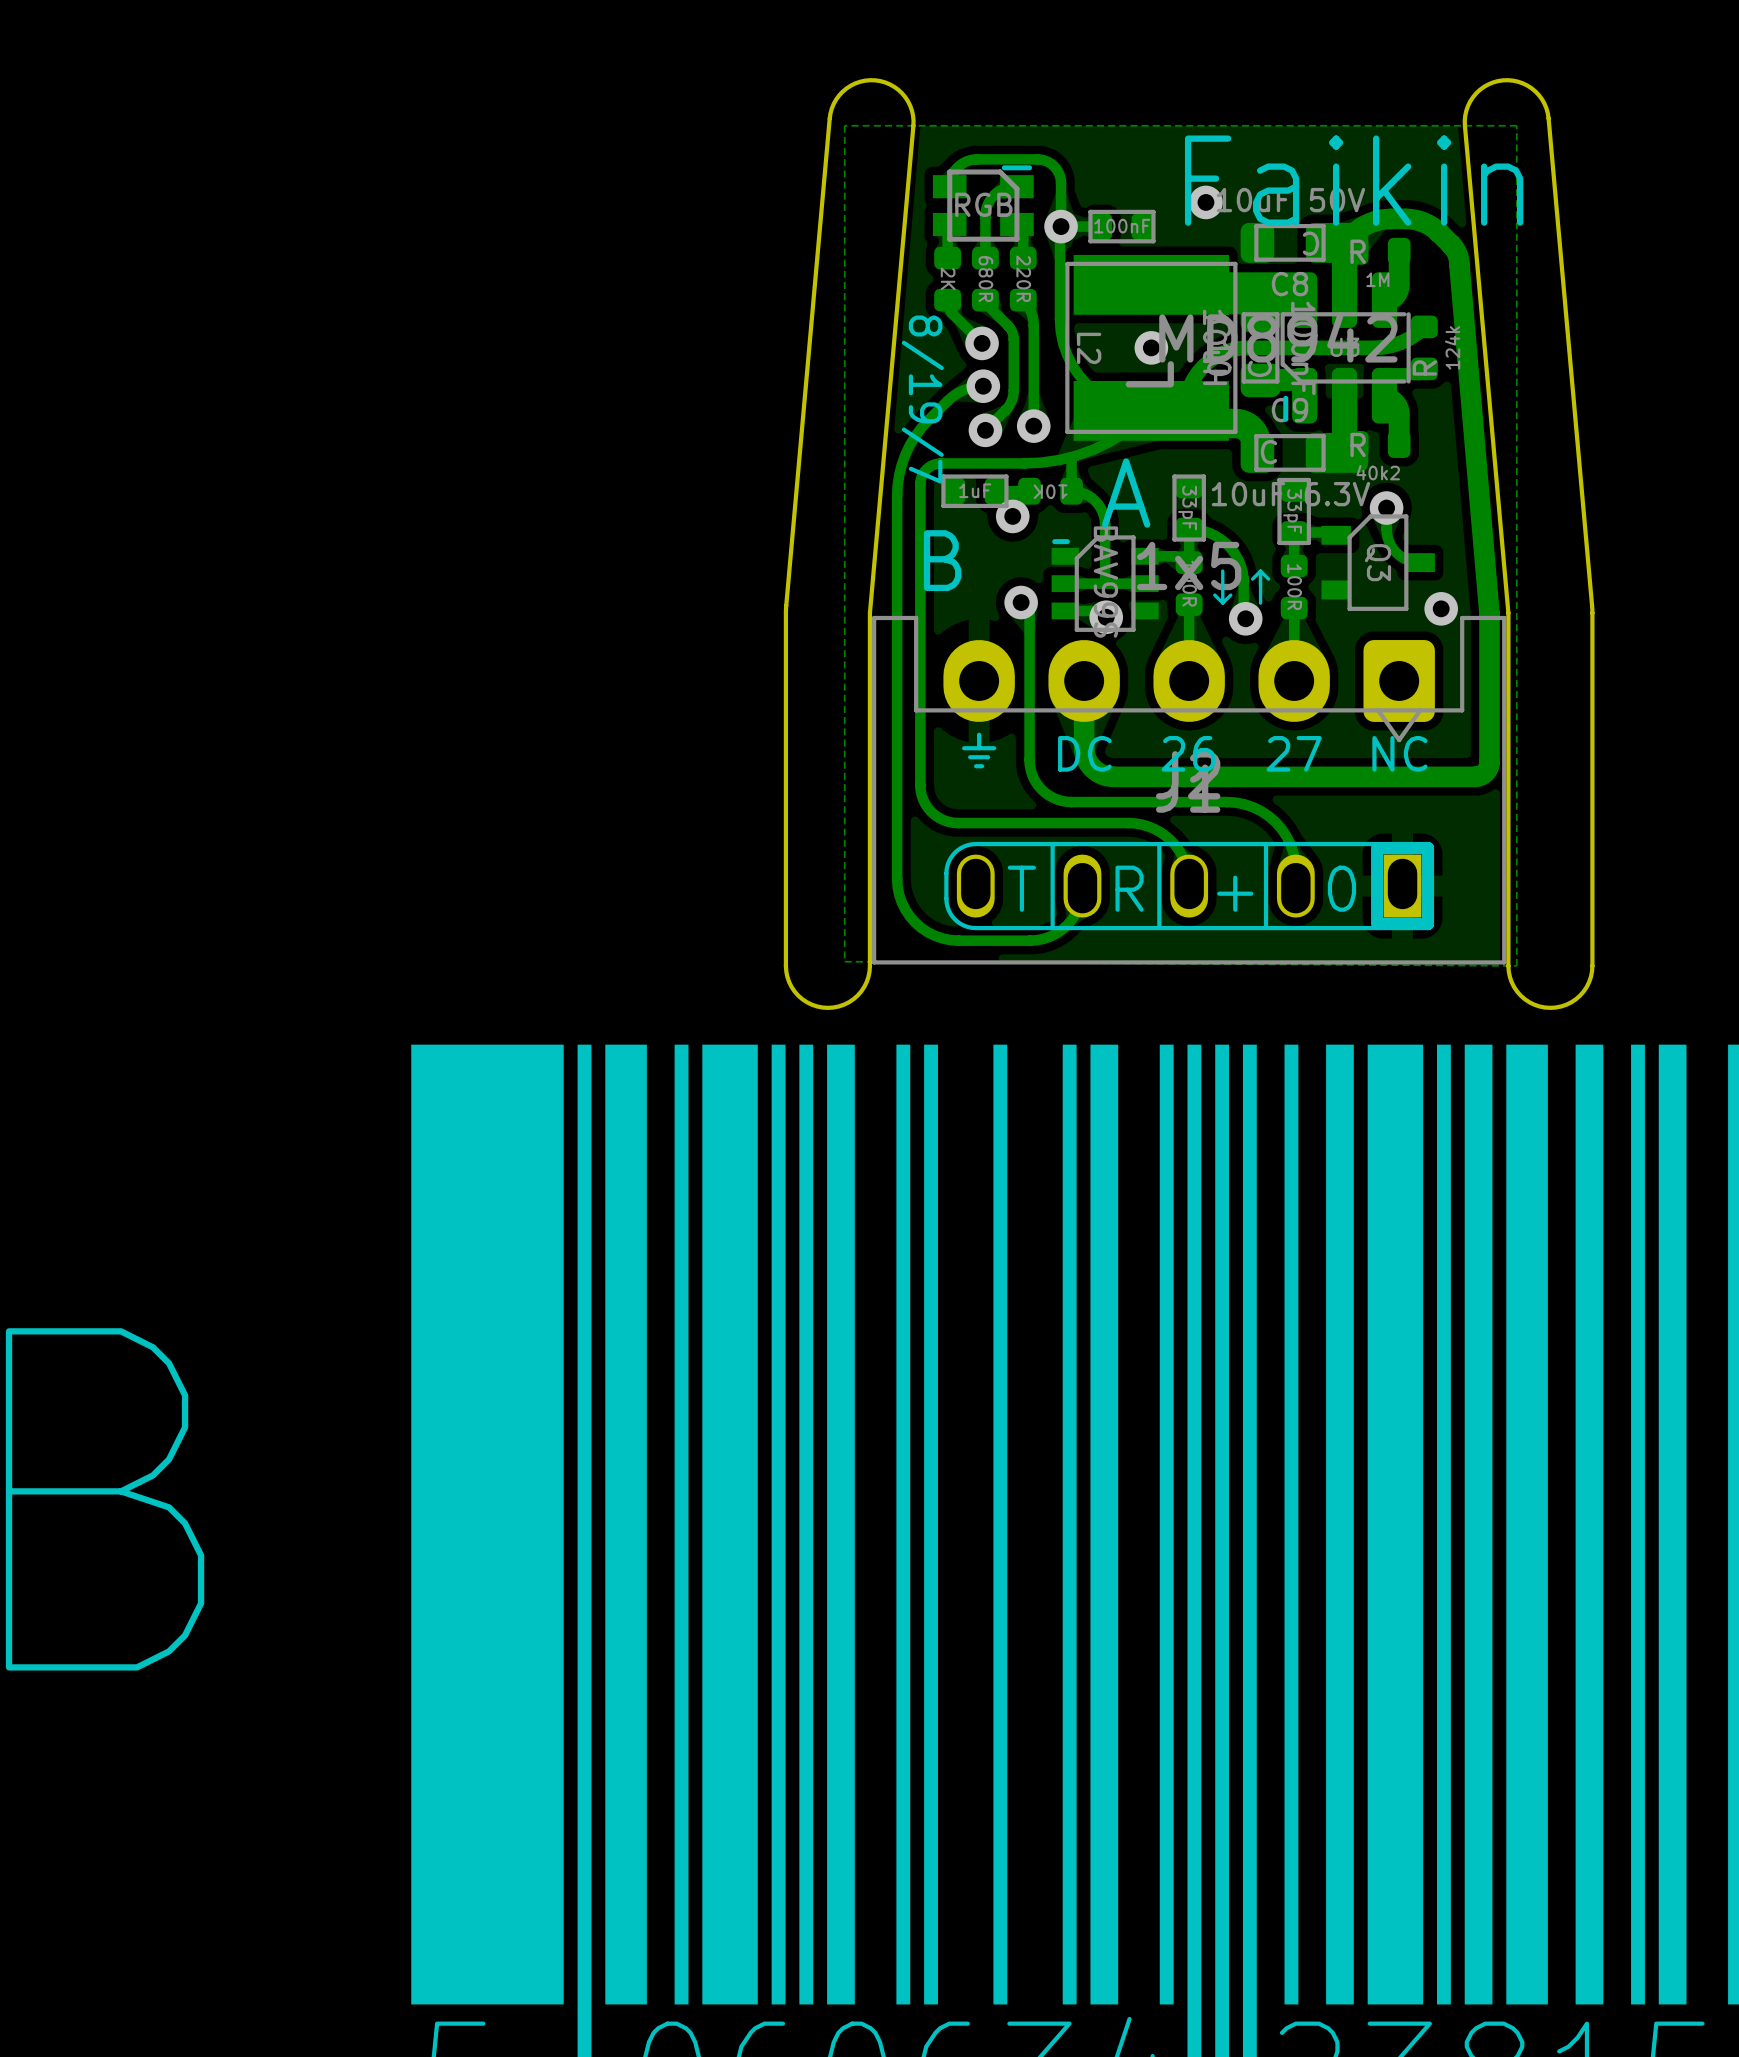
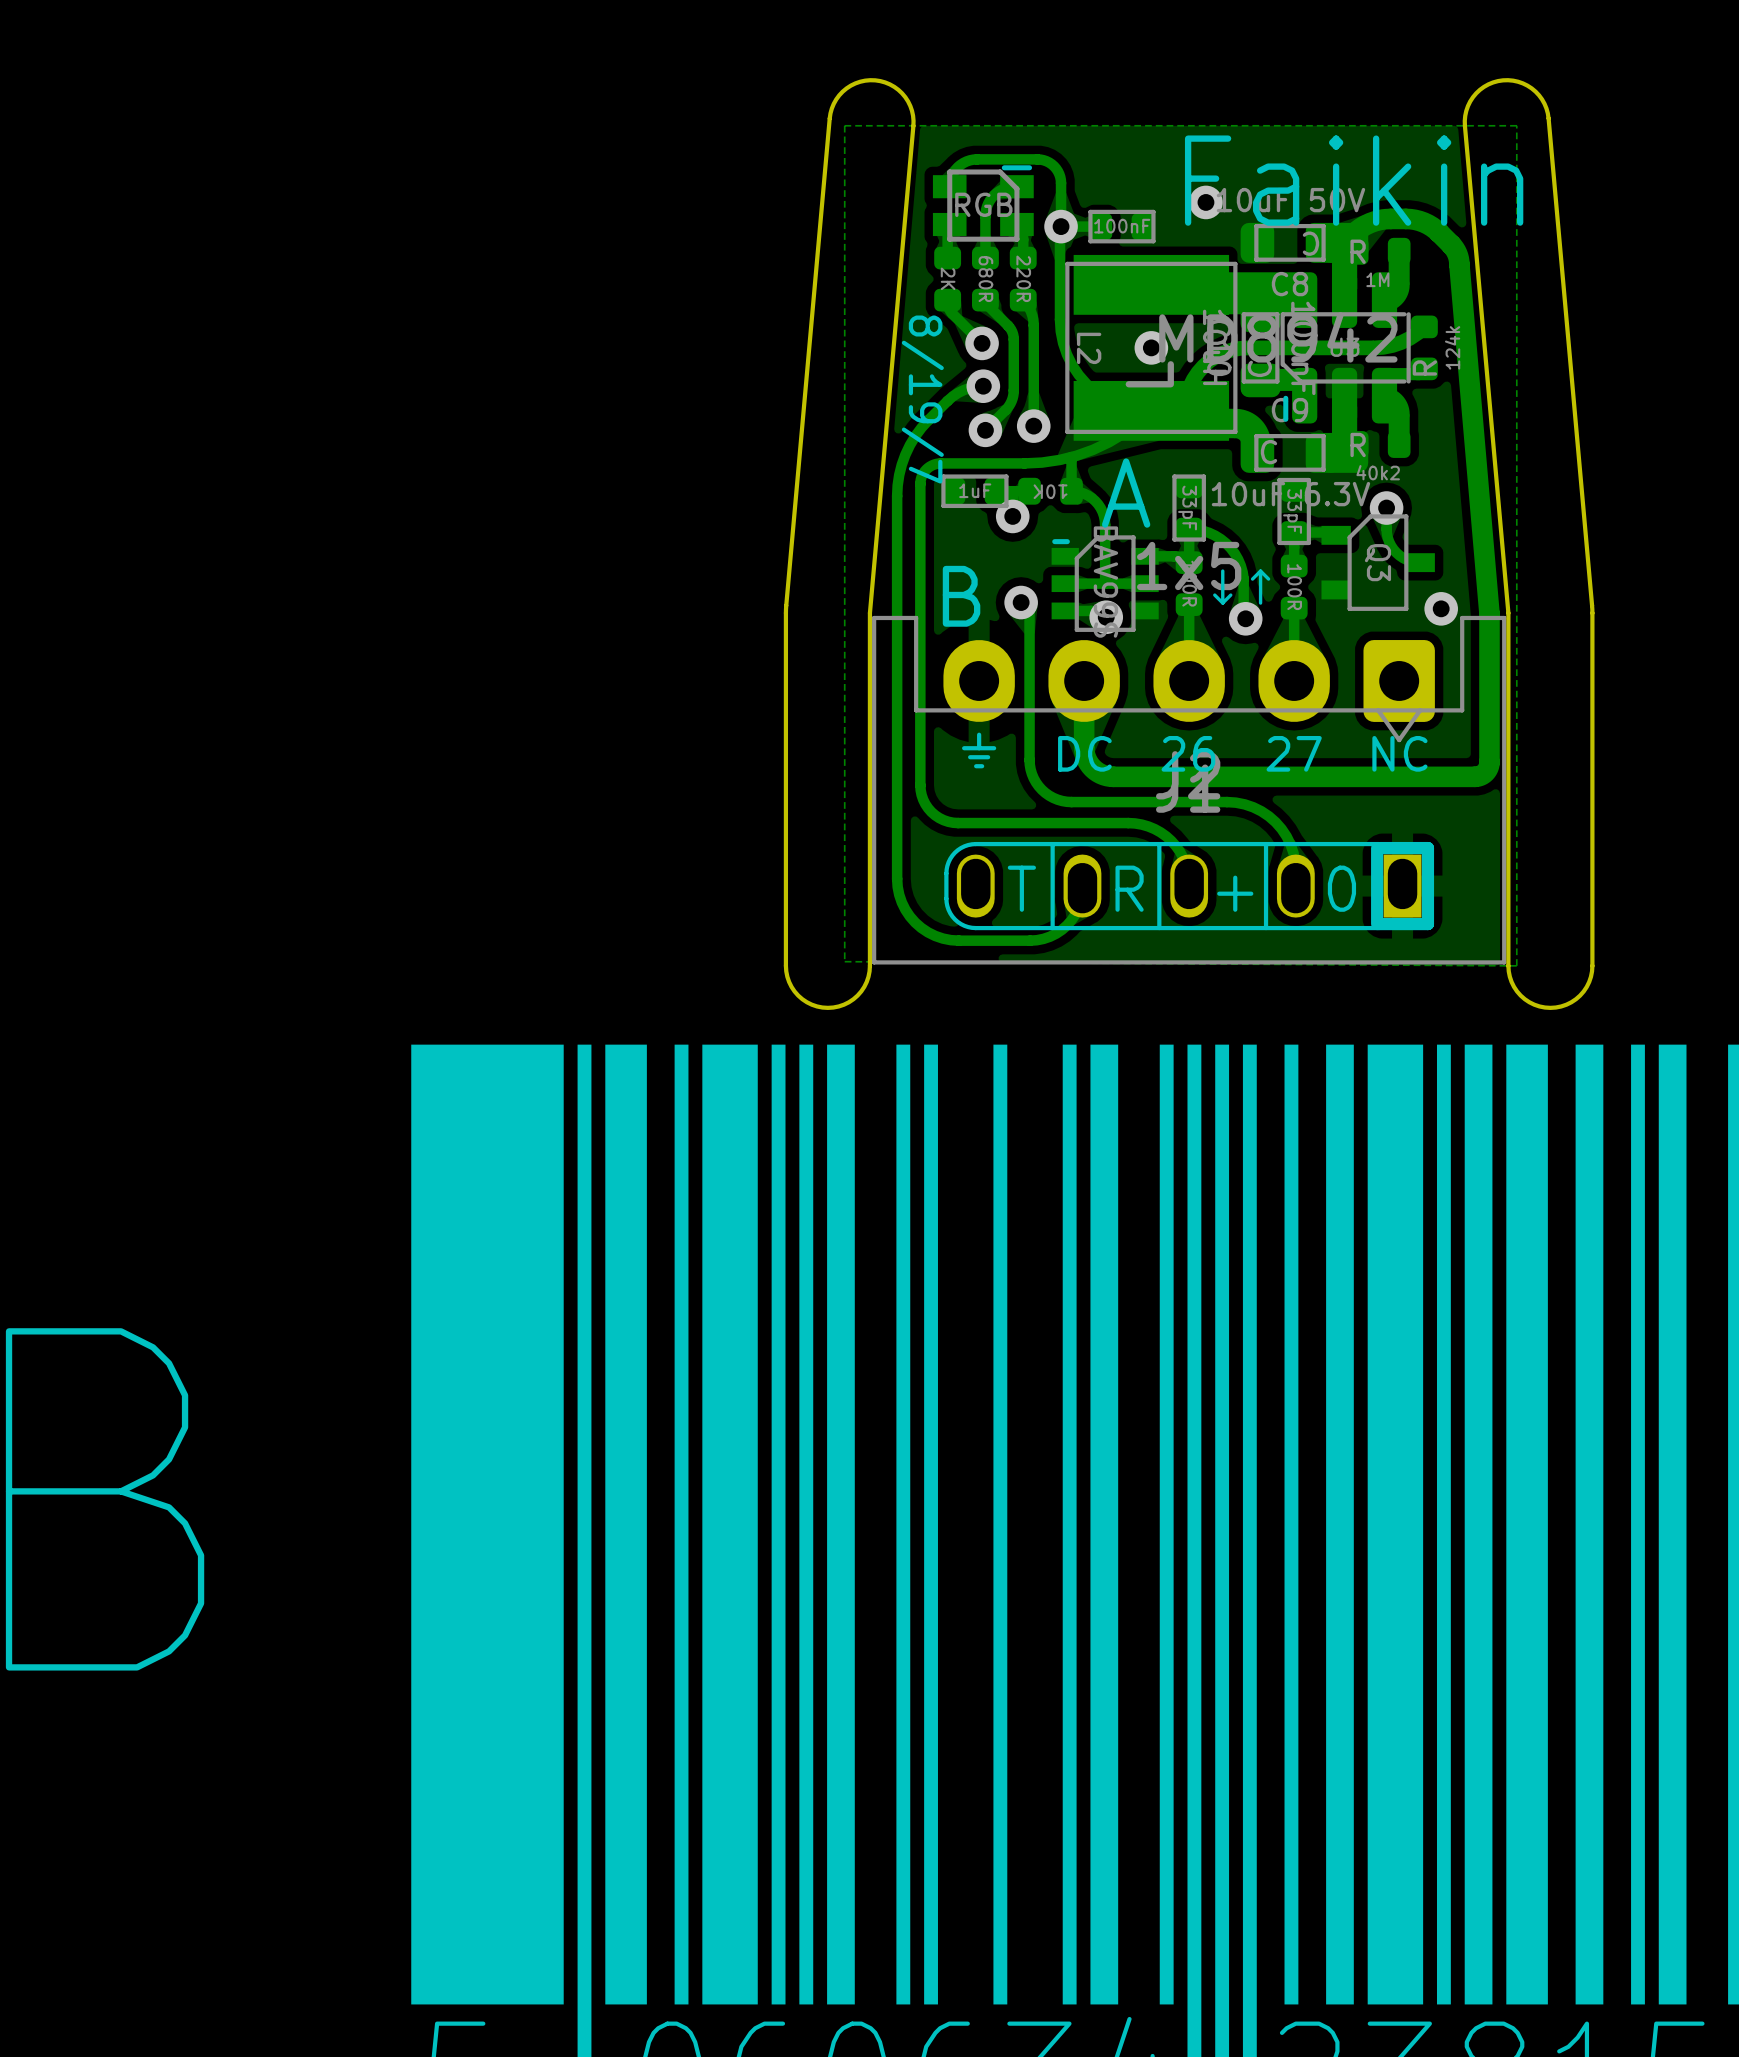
text position: B (942, 560) -> B (961, 596)

